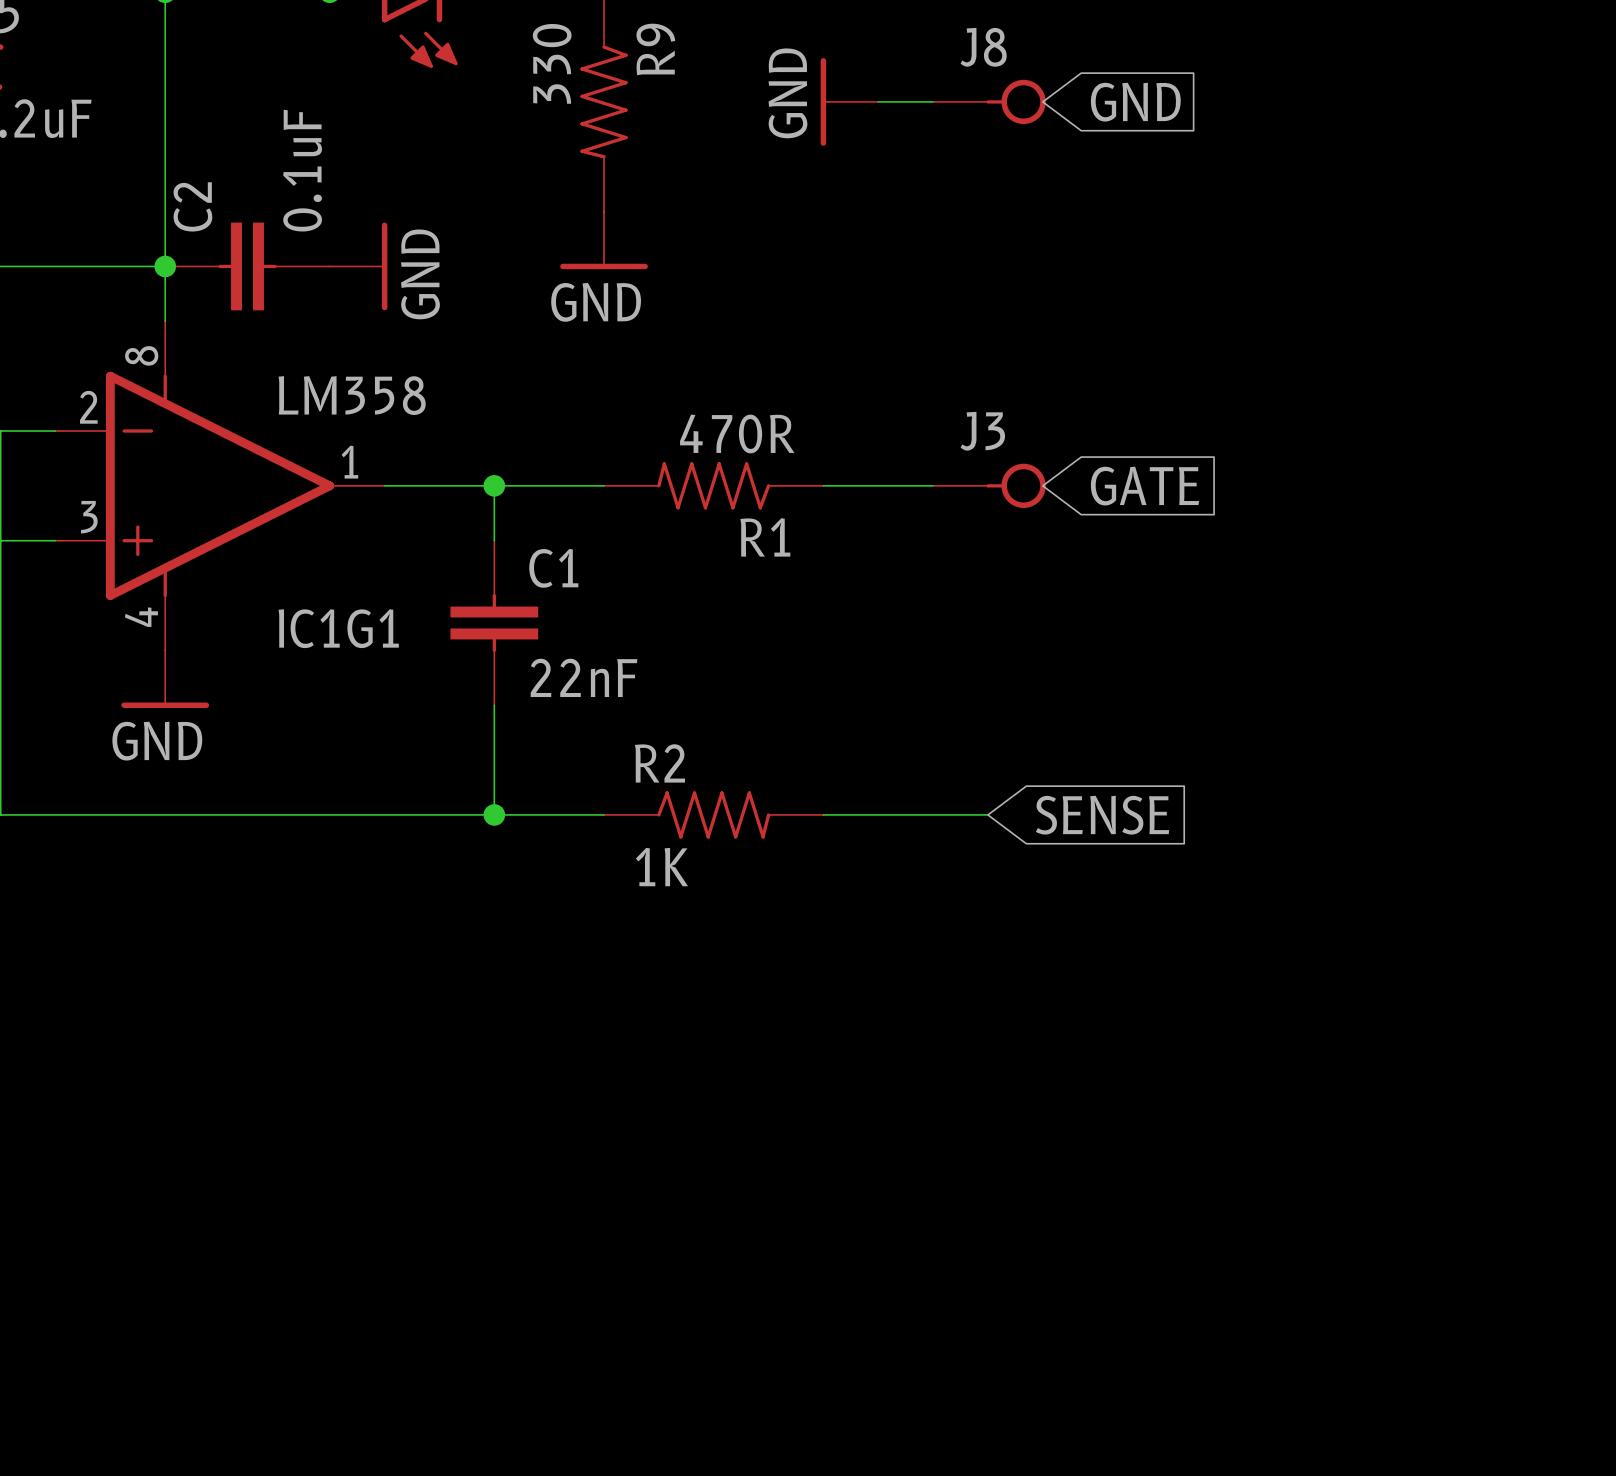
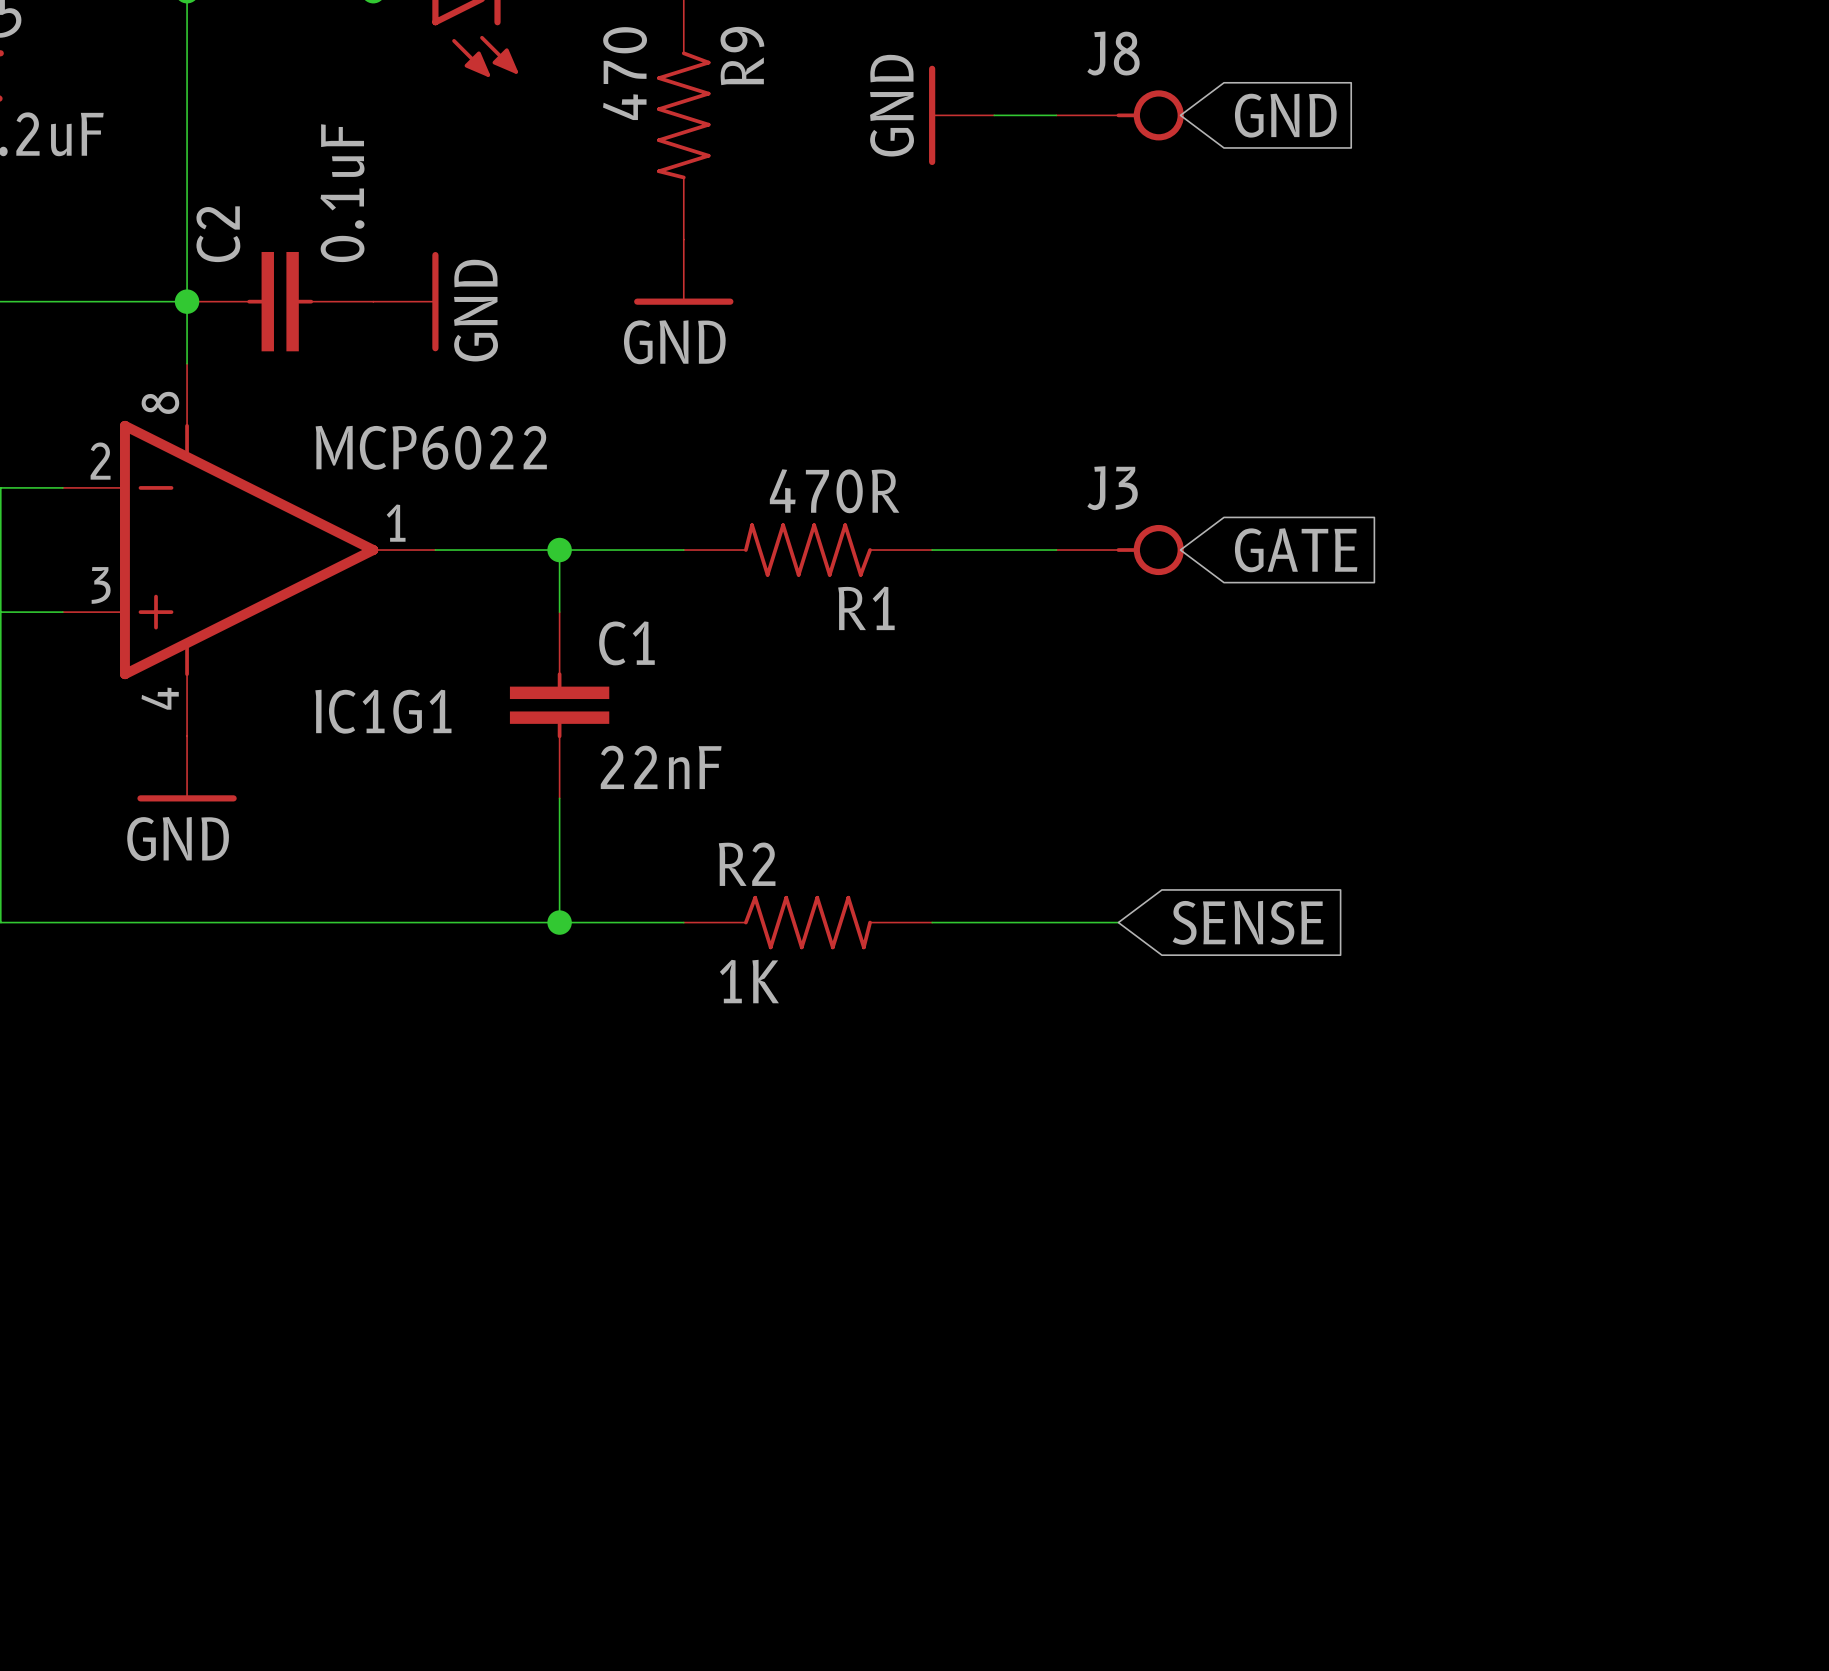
R9 value: 330 (552, 63) -> 470 (625, 73)
IC1G1 value: LM358 (352, 395) -> MCP6022 (431, 447)

